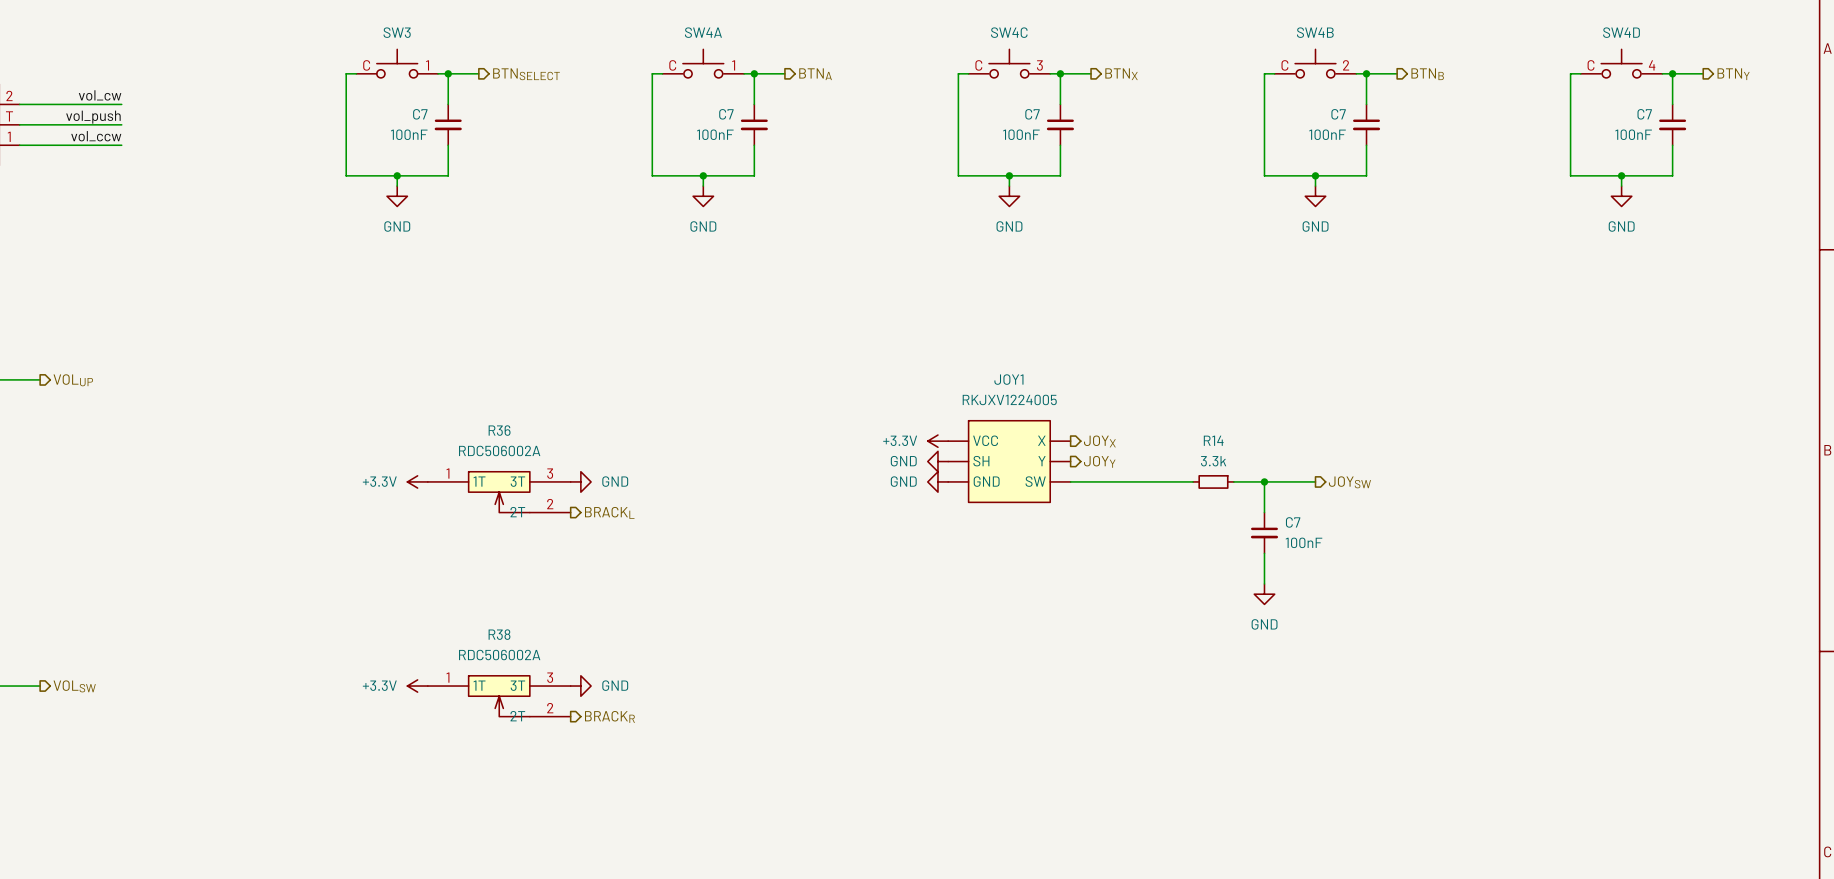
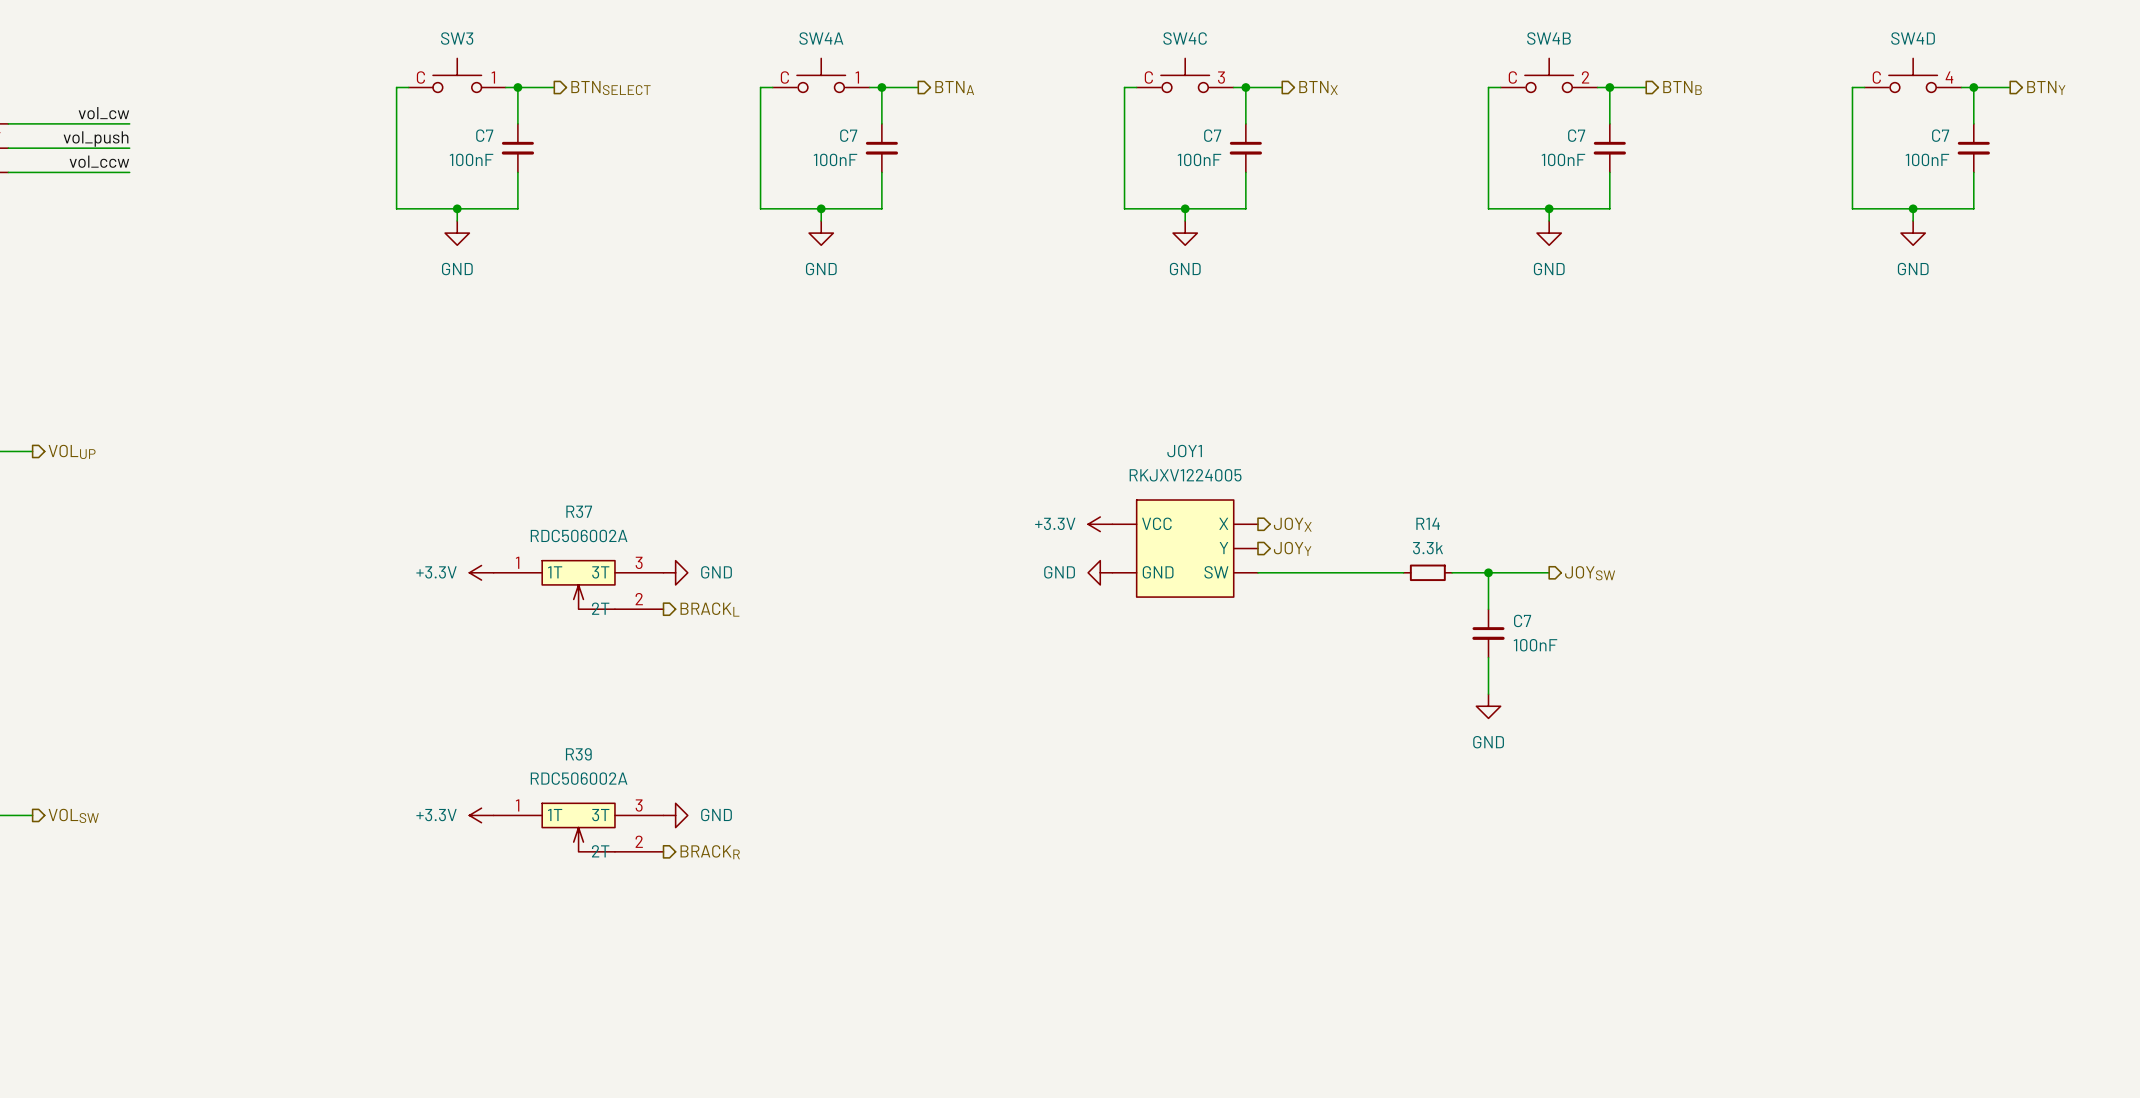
JOY1 symbol: [948, 420, 1071, 503] -> [1112, 500, 1258, 598]
R36 name: R36 (499, 430) -> R37 (579, 511)
power symbol: GND (937, 461) -> none
R38 name: R38 (499, 634) -> R39 (578, 754)

